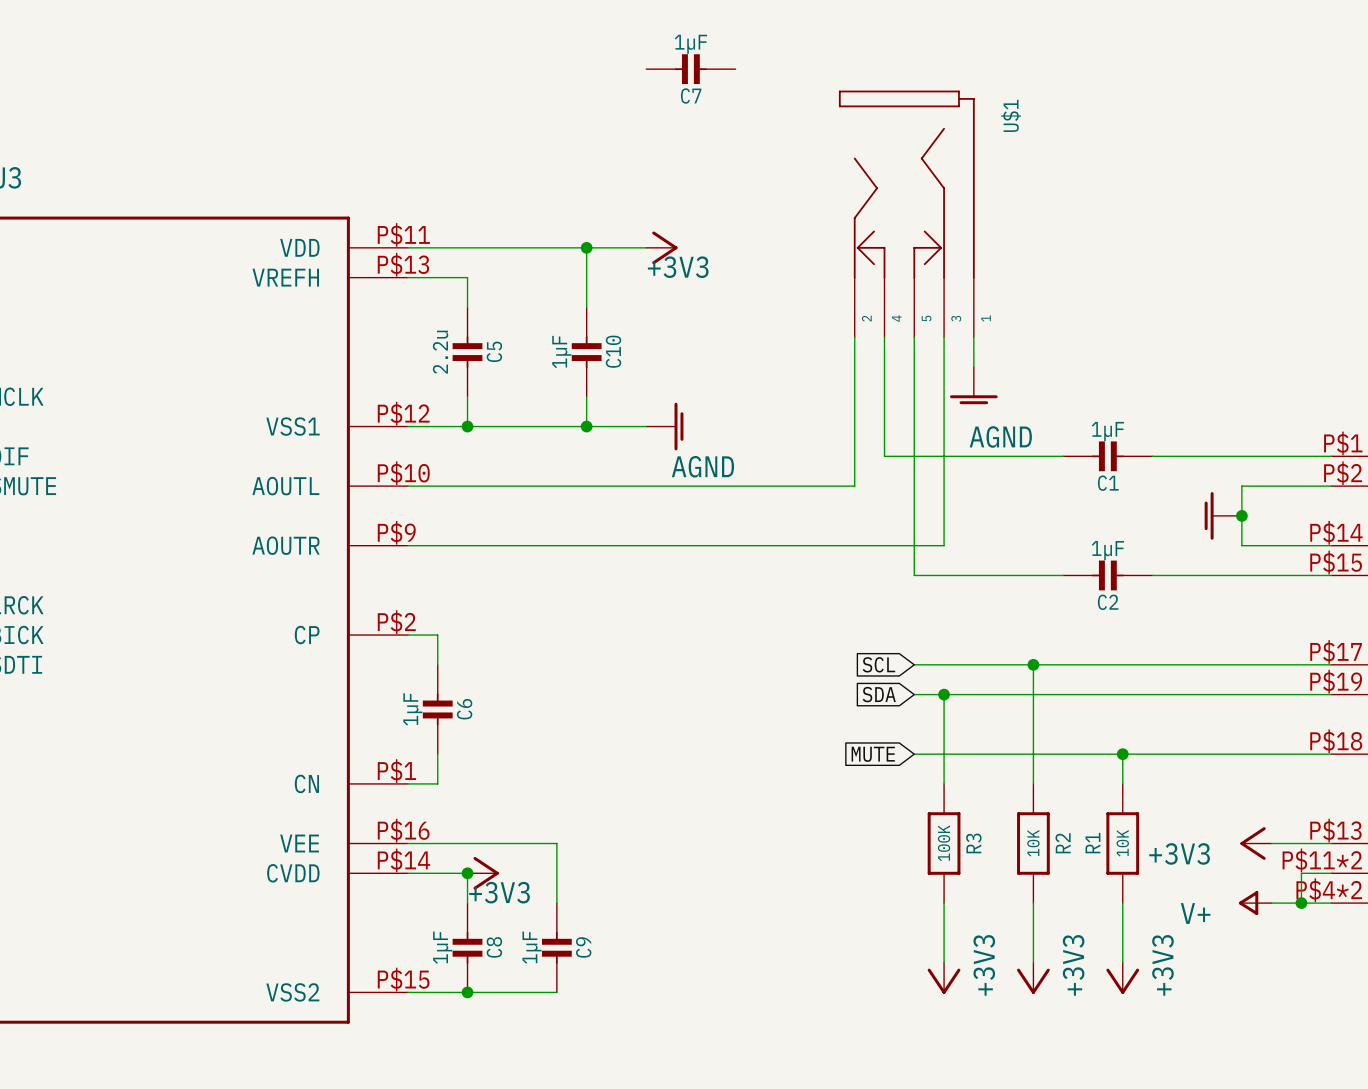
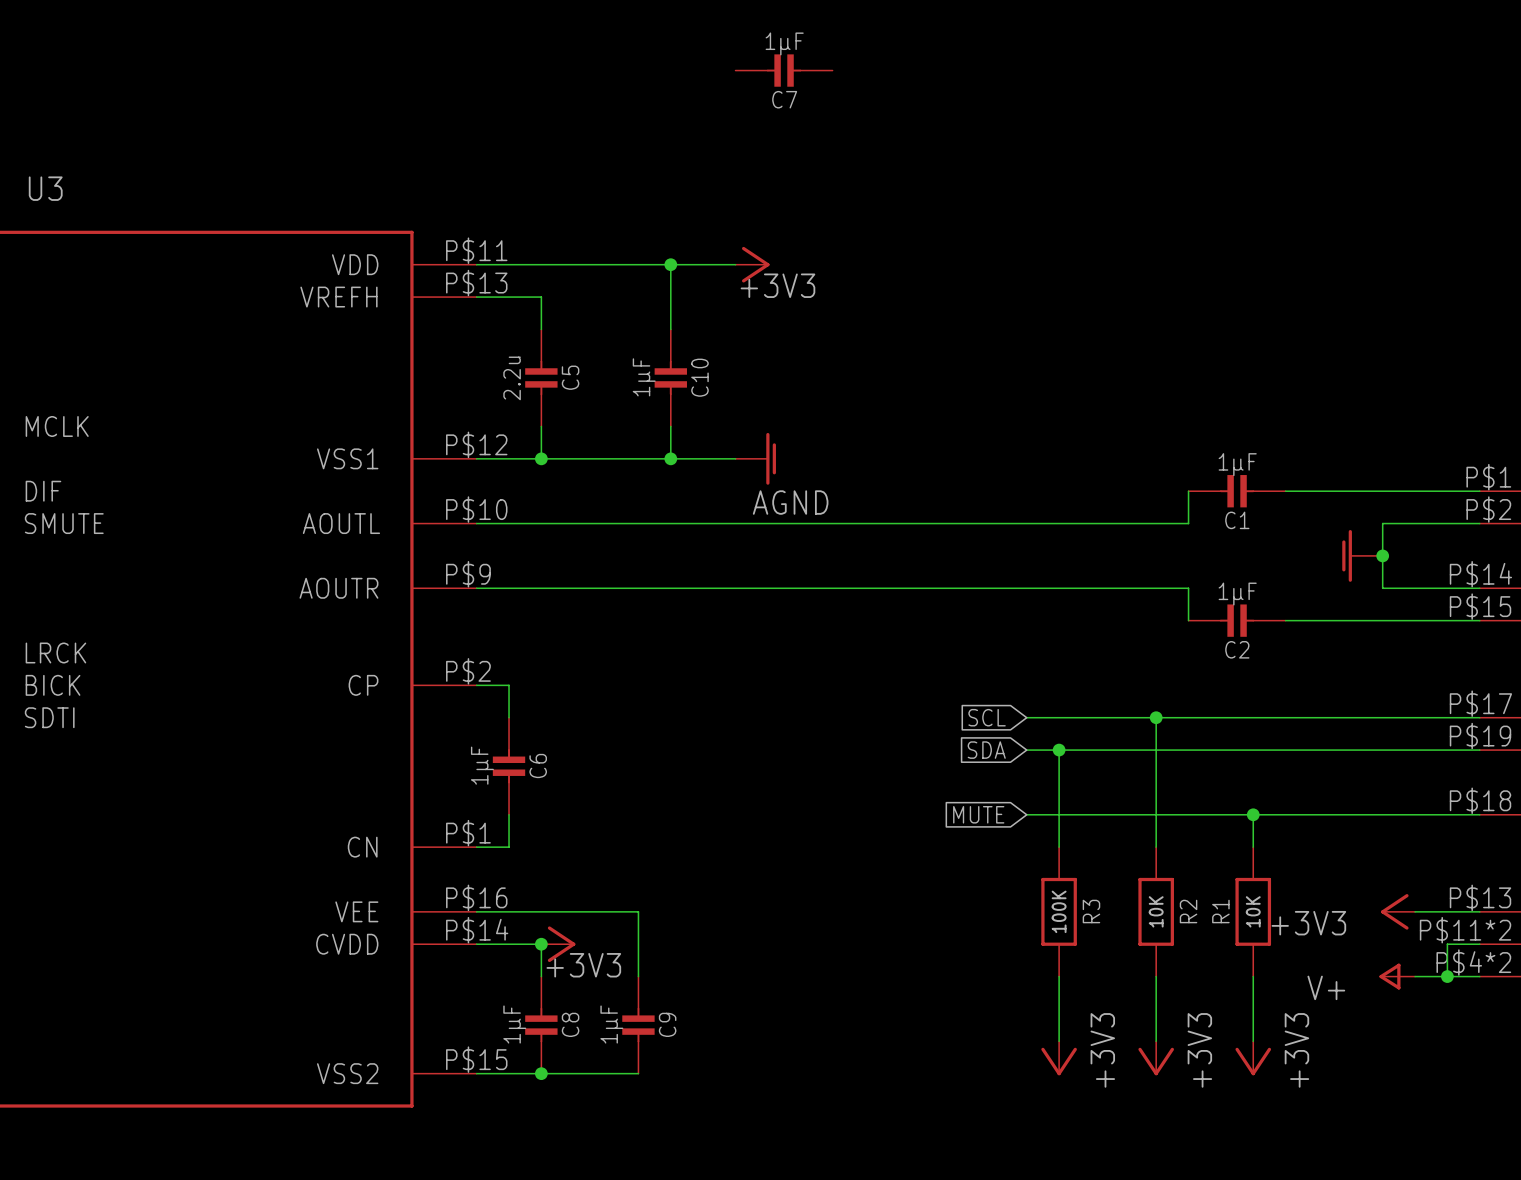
U$1: (906, 213) -> none
wire: (854, 337) (854, 486) -> none
wire: (884, 337) (884, 456) (1063, 456) -> (962, 523) (1188, 523) (1188, 491)
wire: (914, 337) (914, 575) (1063, 575) -> (1059, 588) (1188, 588) (1188, 620)
wire: (944, 337) (944, 545) -> none
wire: (973, 337) (973, 366) -> none
power symbol: AGND (973, 385) -> none

